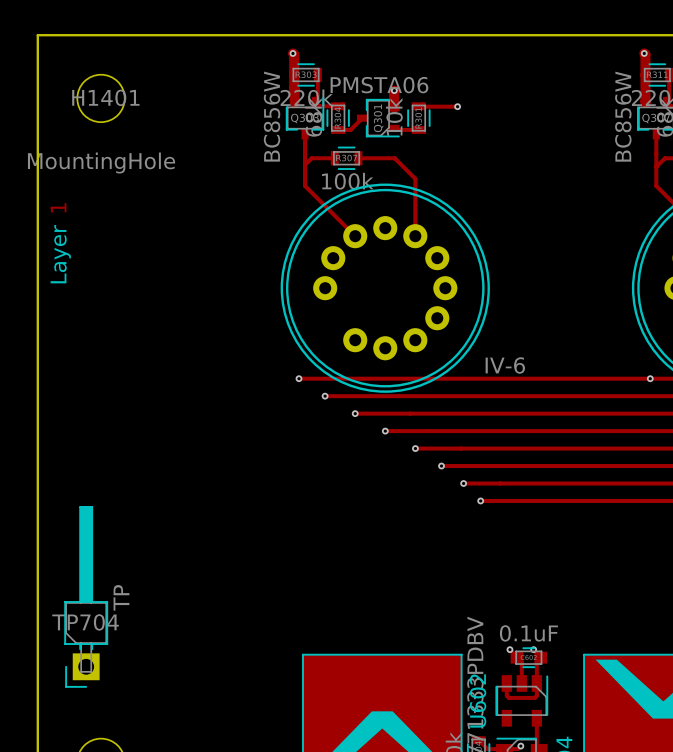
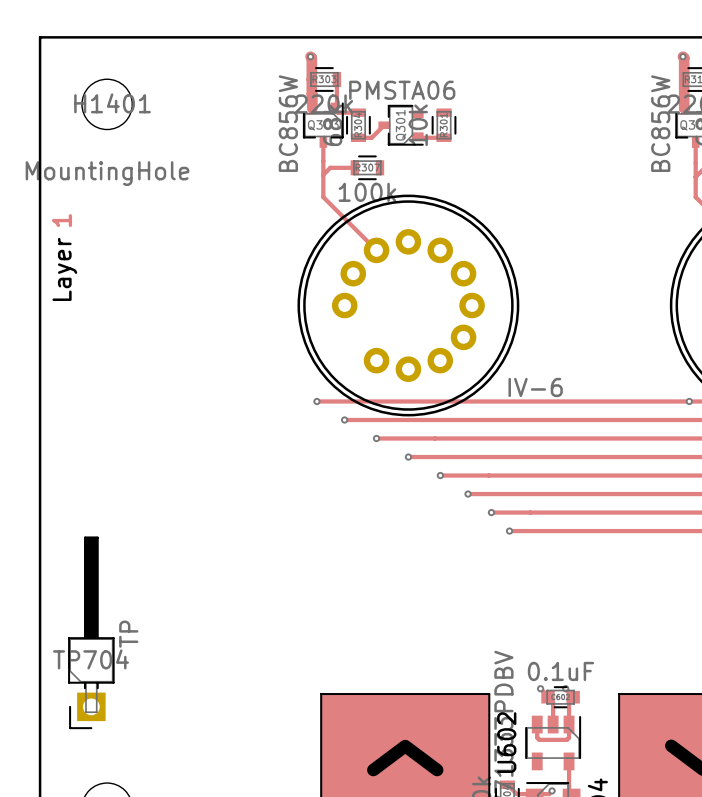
track: (394, 90) (394, 107) -> none
via: (394, 90) -> none
track: (418, 106) (457, 106) -> none
via: (457, 106) -> none
track: (358, 158) (394, 158) (415, 178) (415, 236) -> none

